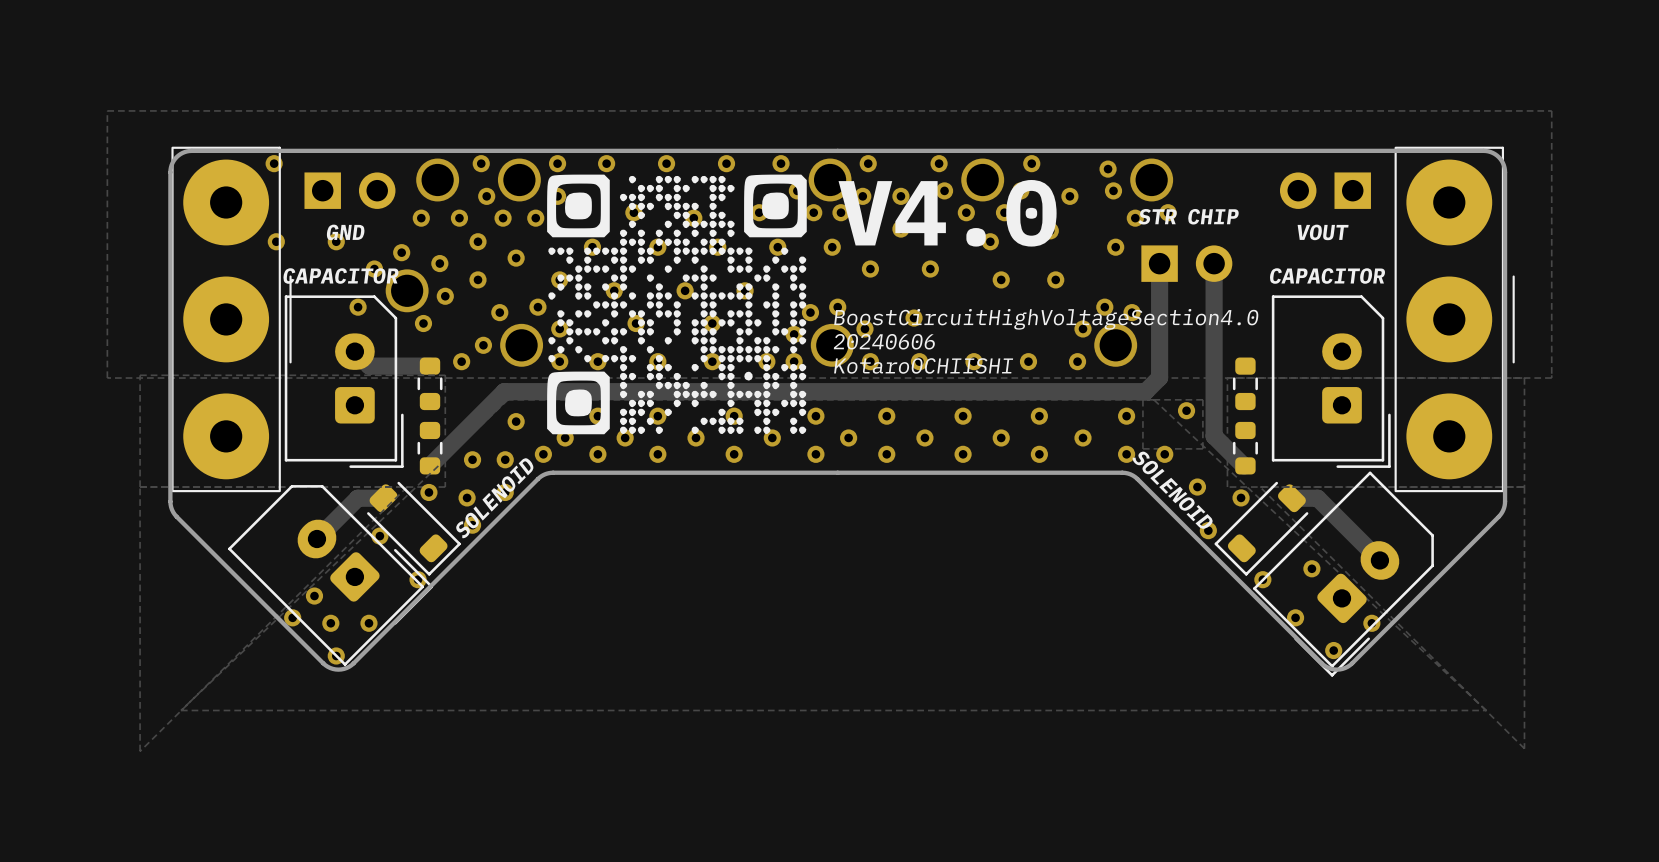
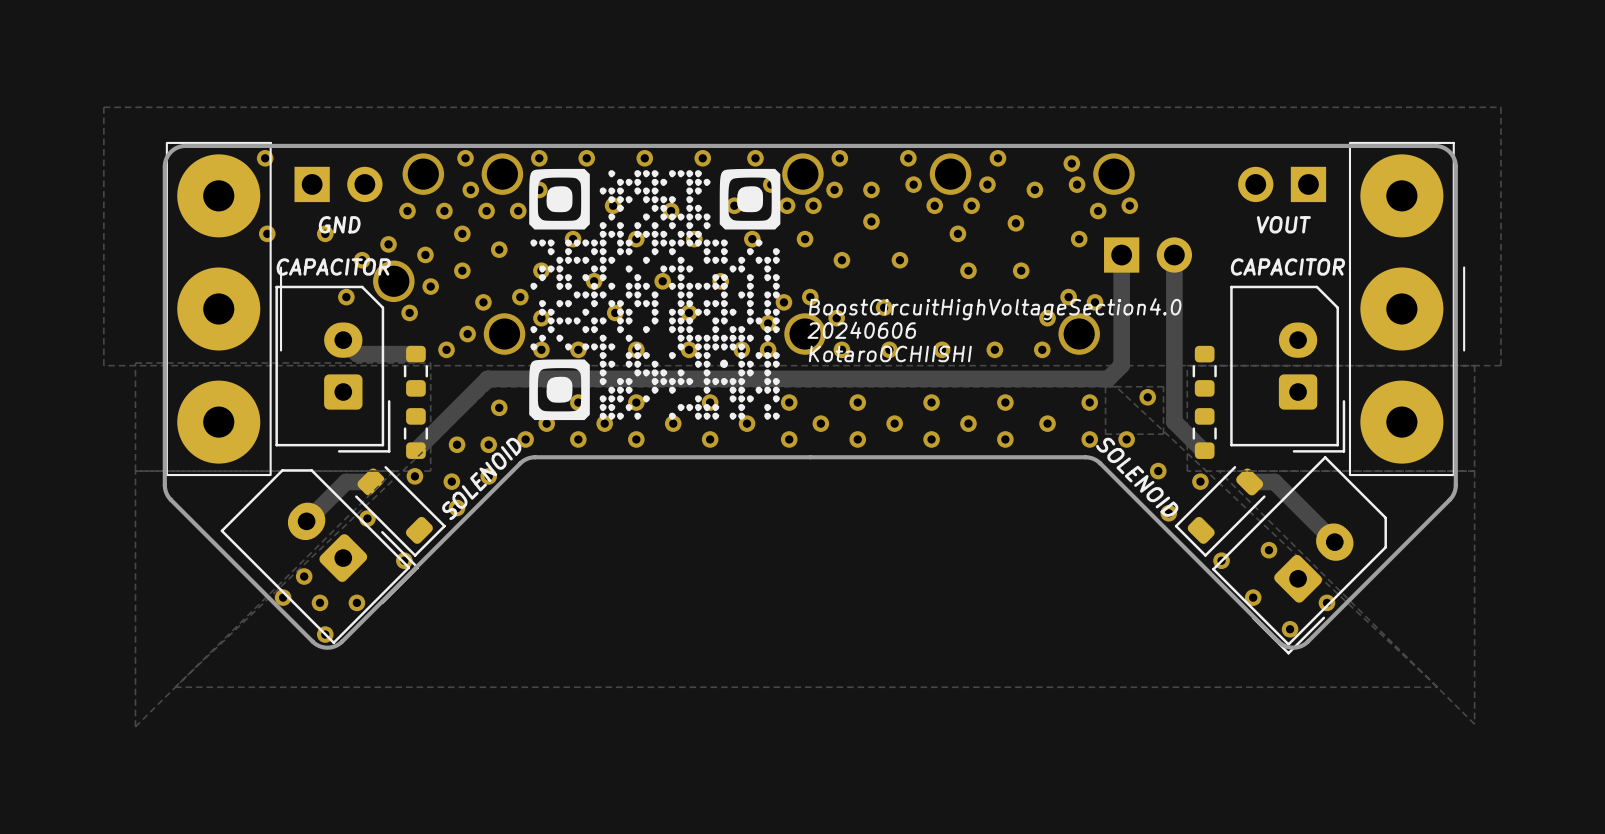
text: V4.0 (947, 213) -> none
text: STR (1157, 216) -> none
text: CHIP (1213, 216) -> none

